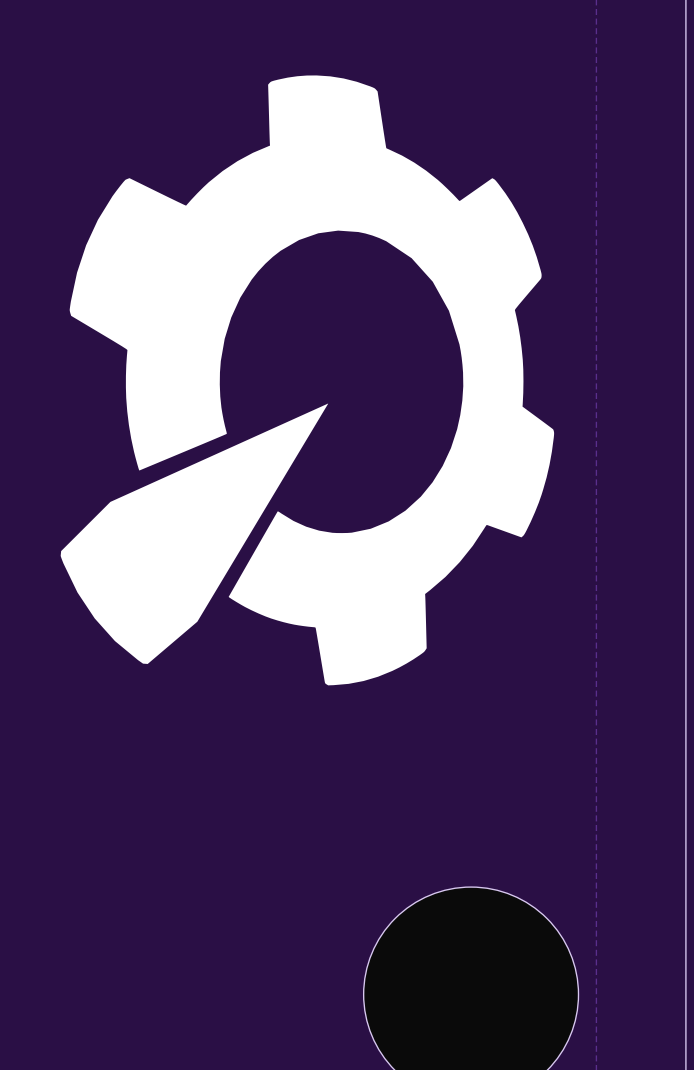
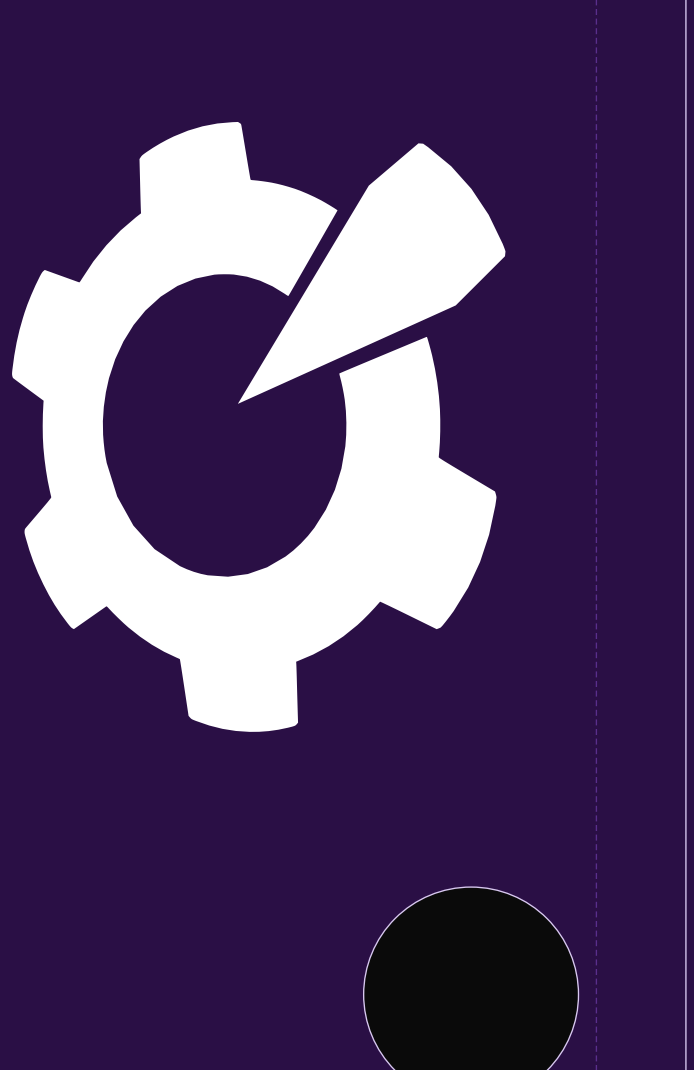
drawing shape: [60, 75, 555, 686] -> [12, 121, 506, 732]

